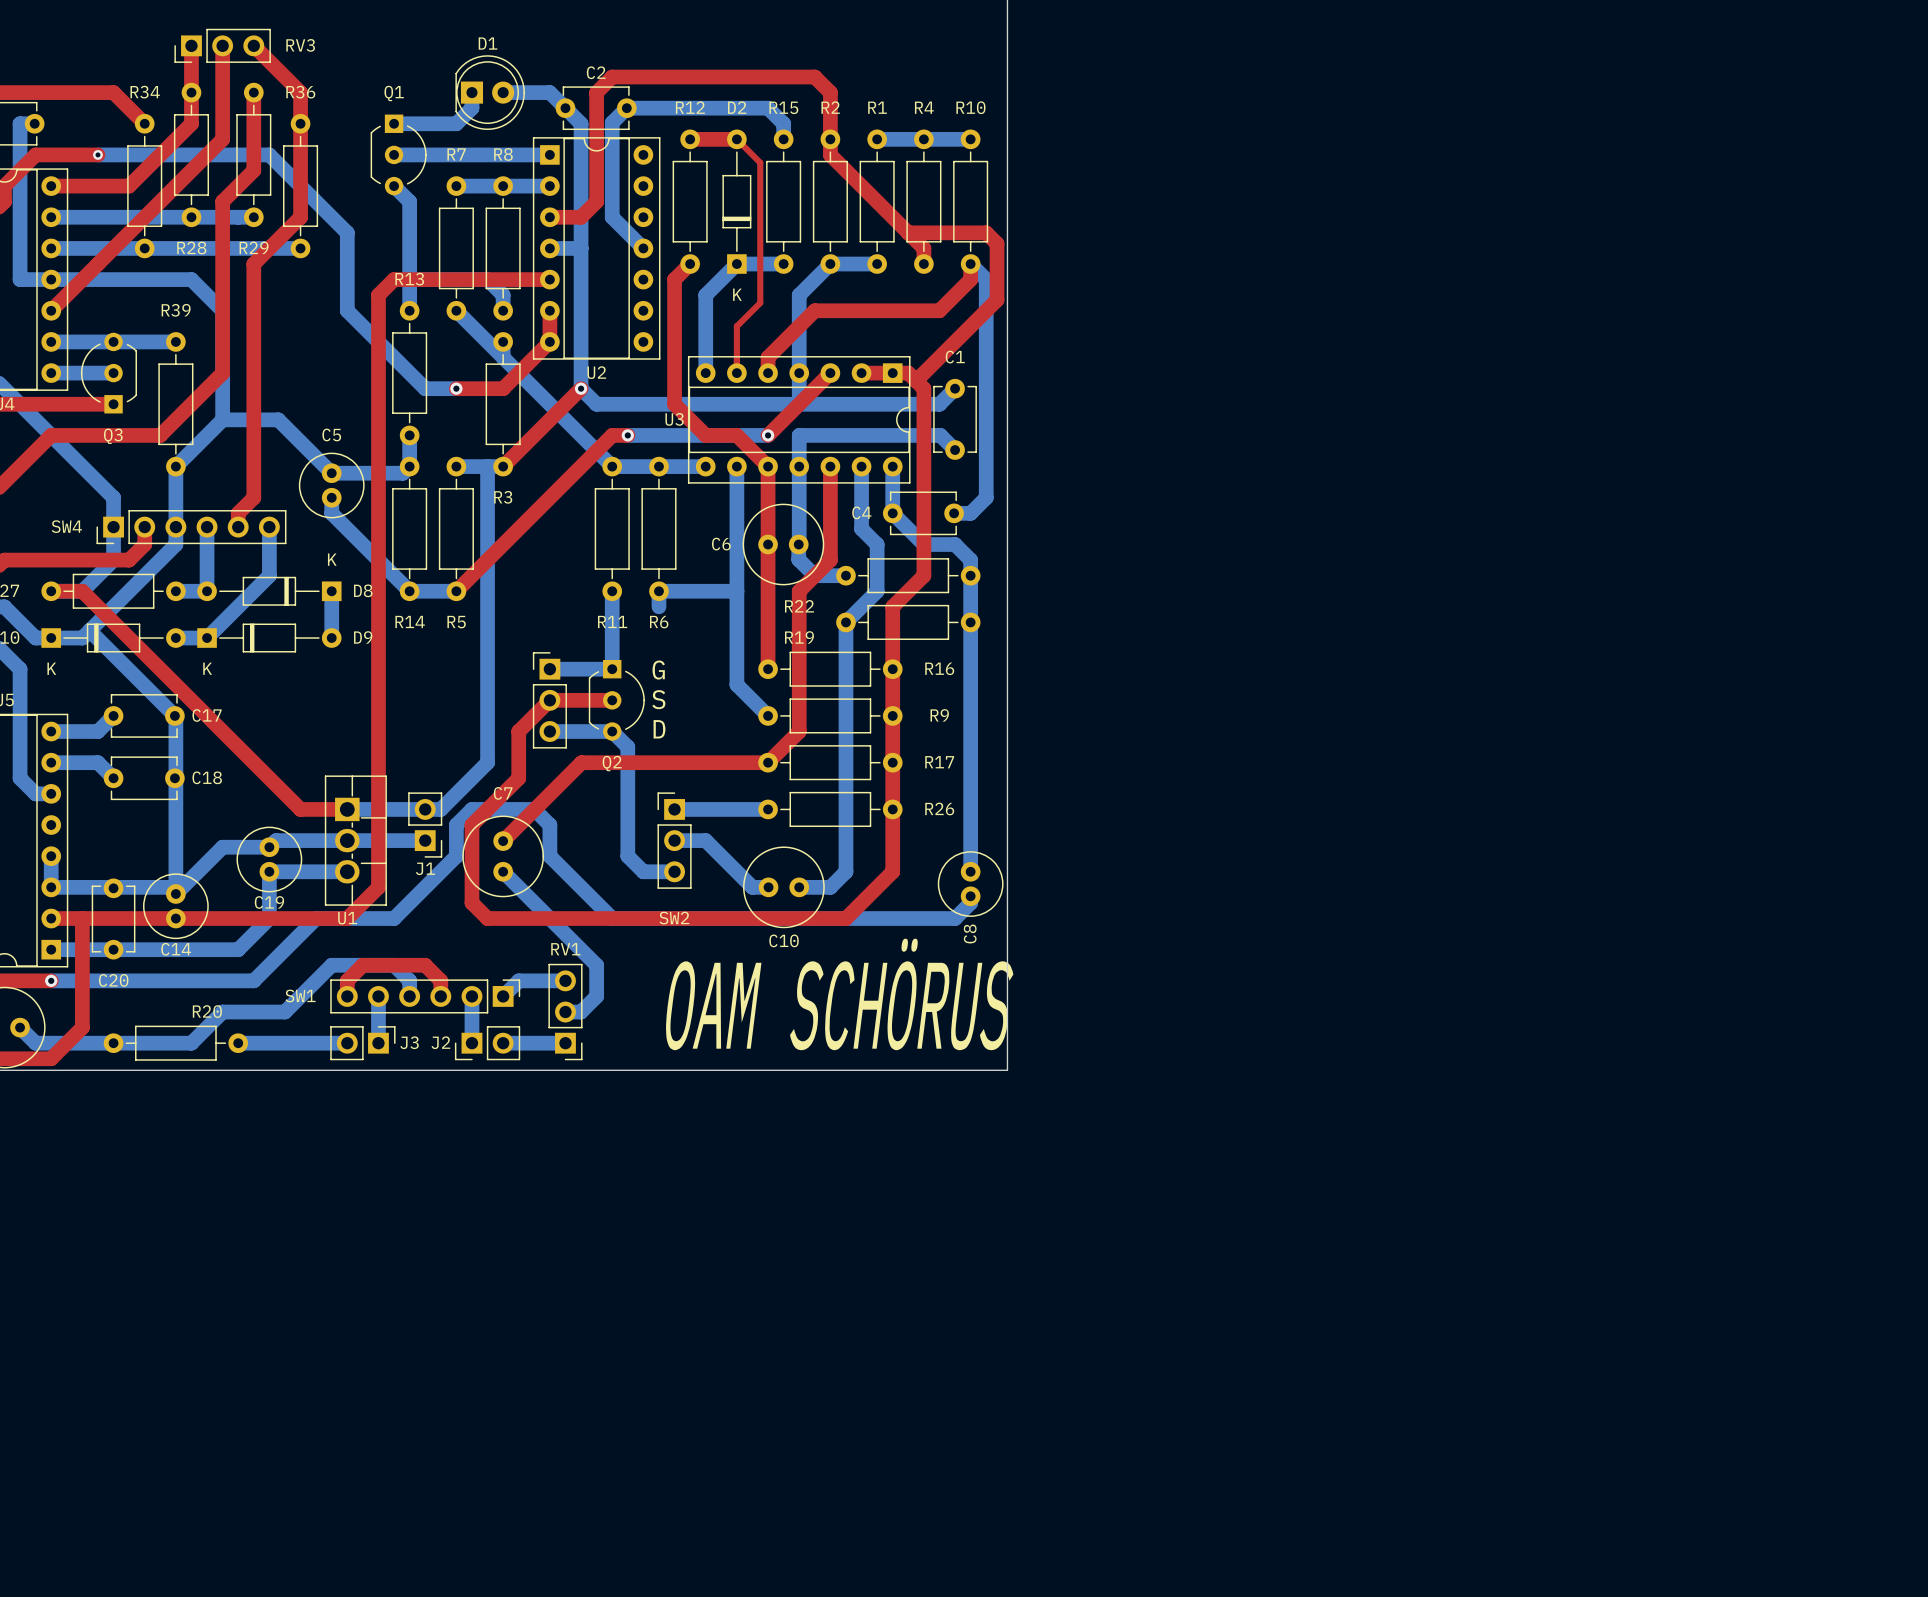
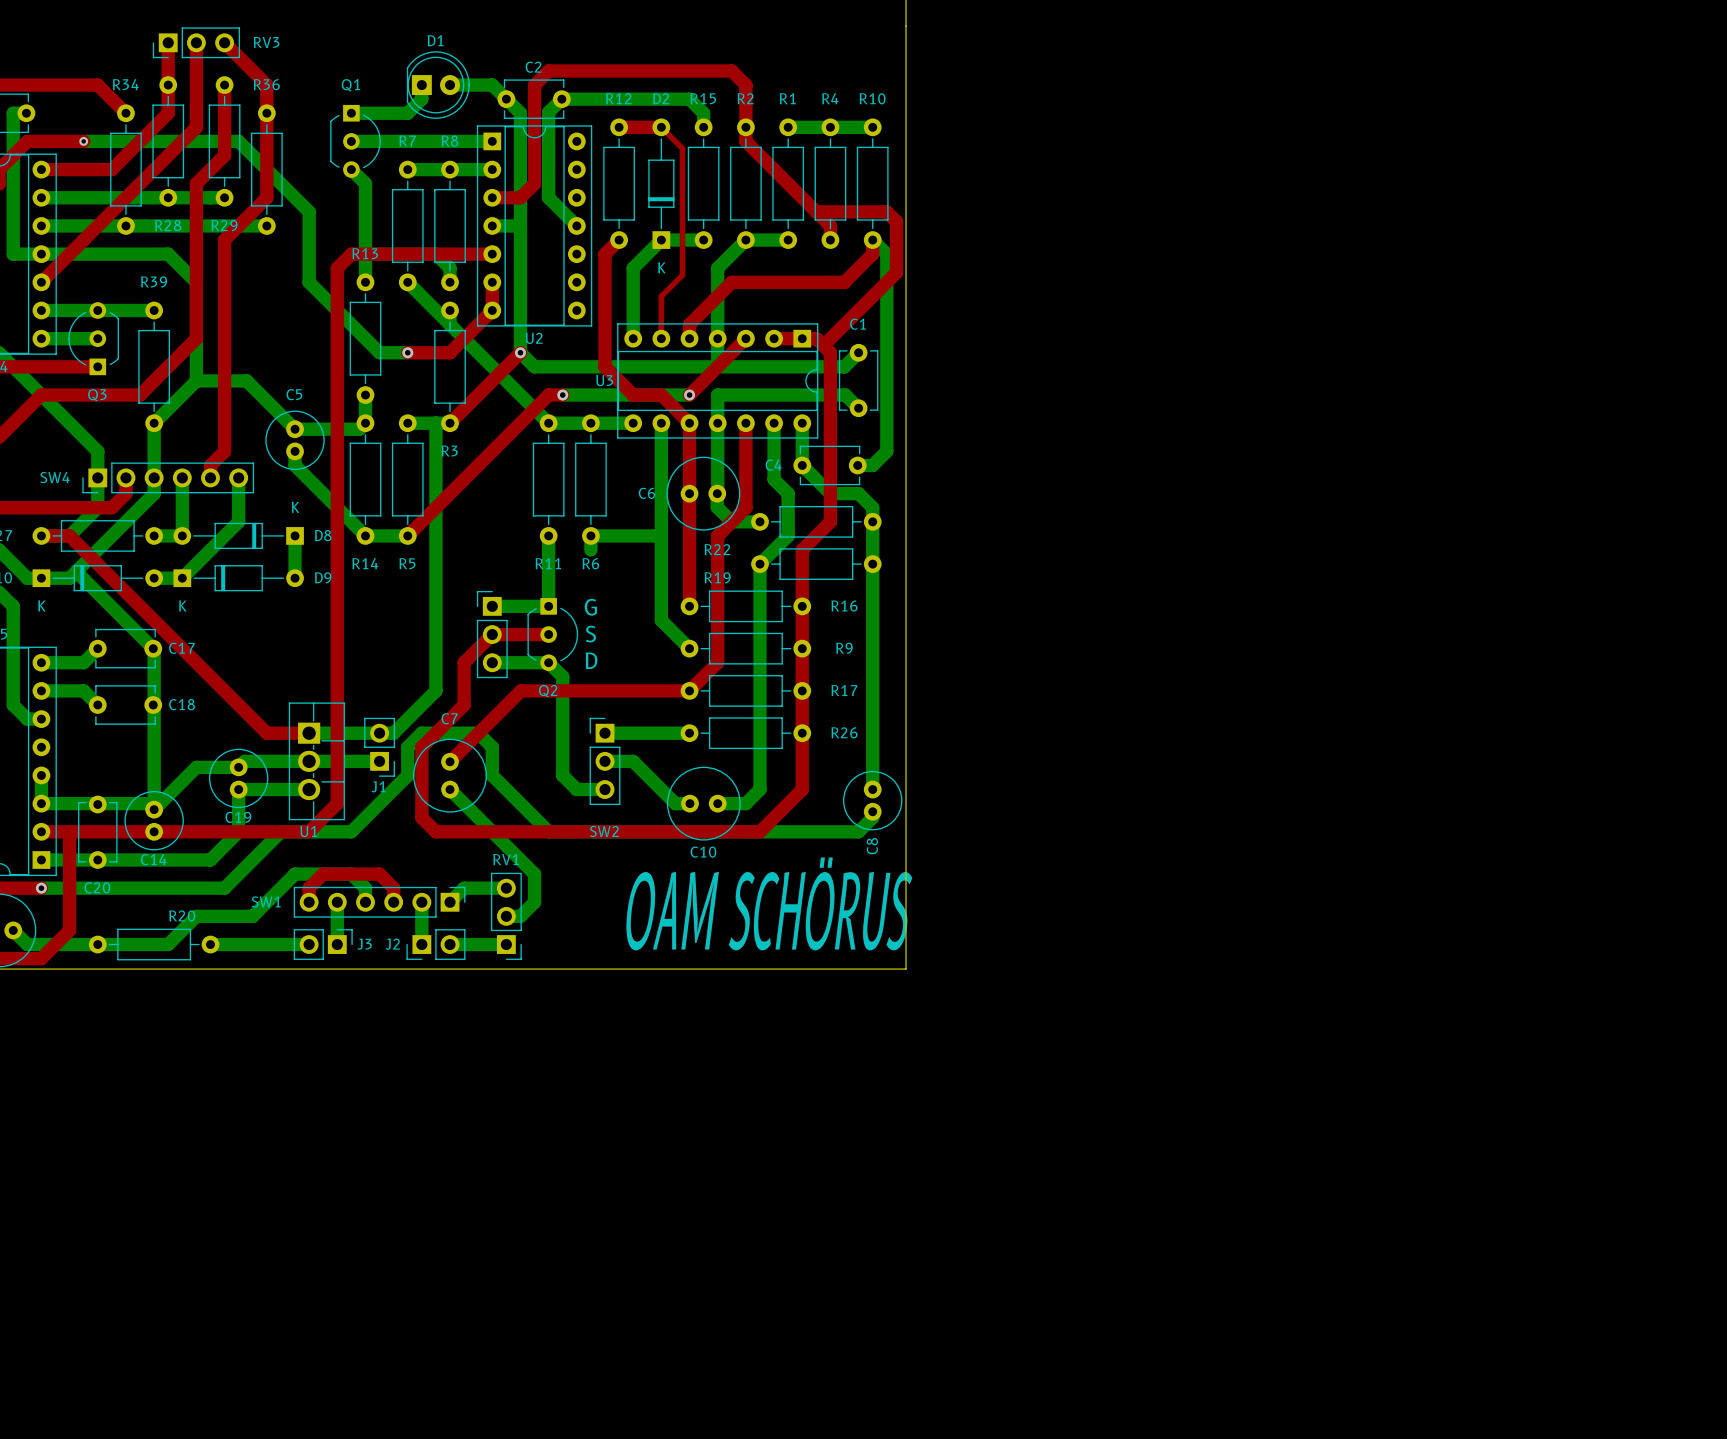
text: OAM SCHÖRUS (839, 994) -> none
text: none -> OAM SCHÖRUS (769, 903)

